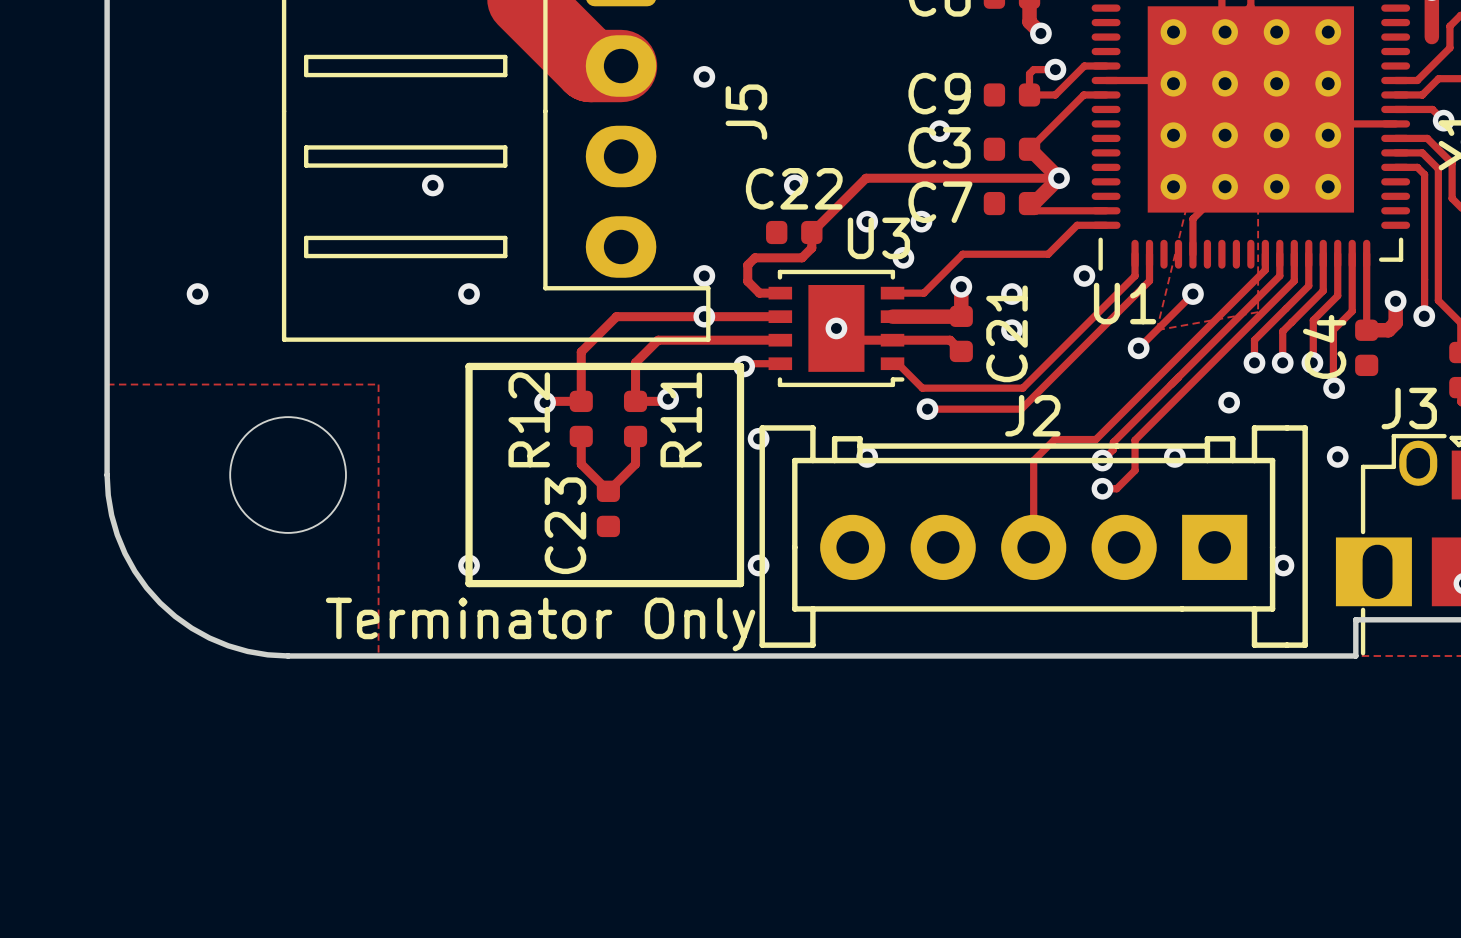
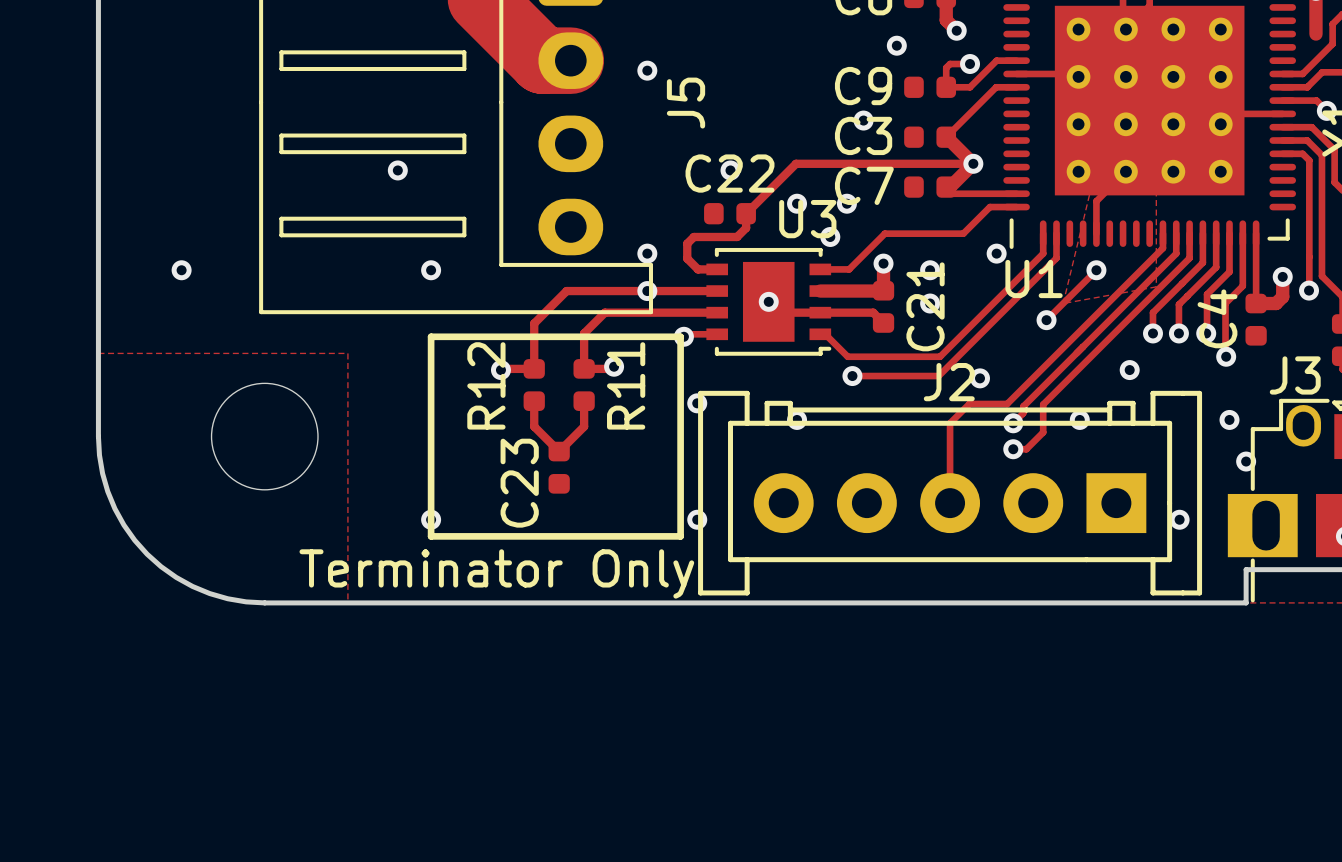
via: none -> (896, 45)
via: none -> (980, 378)
via: none -> (1246, 461)

